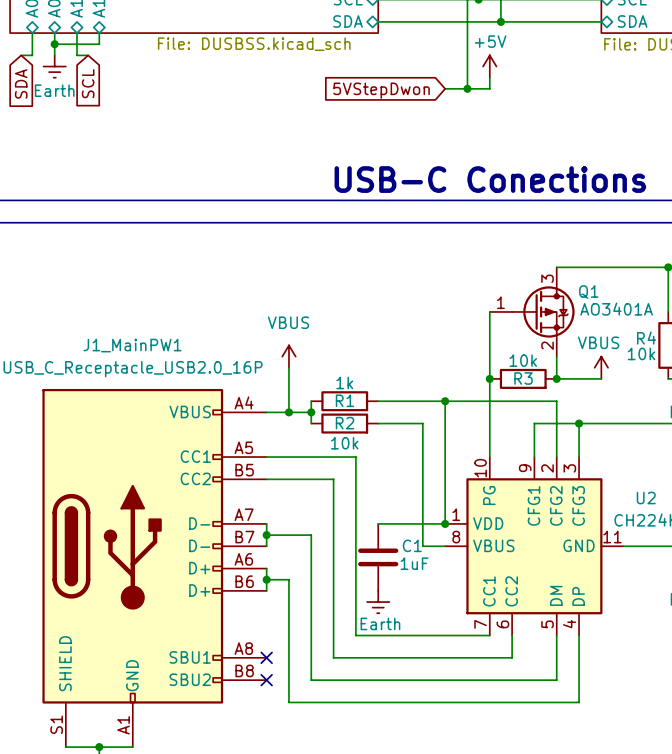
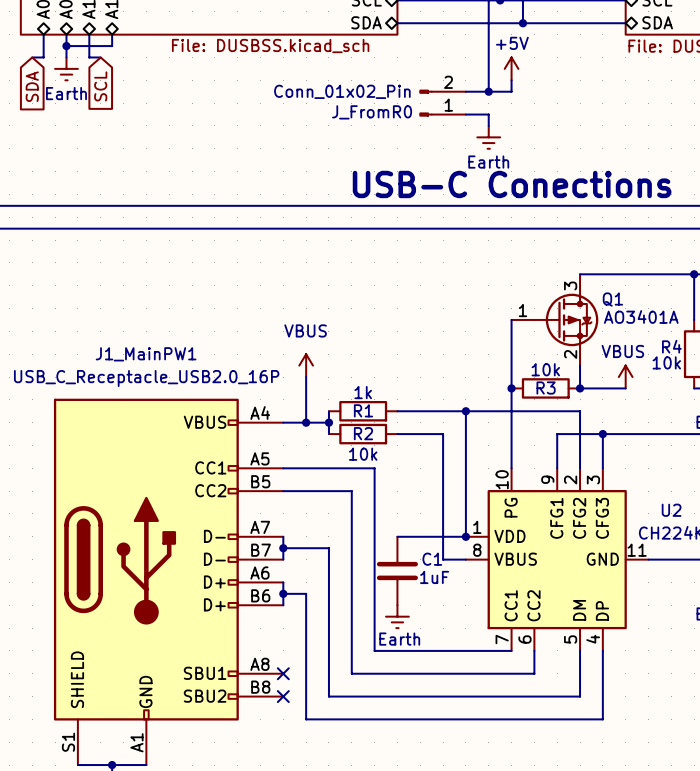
global label: 5VStepDwon (381, 90) -> none
J_FromR0: none -> Conn_01x02_Pin (442, 103)
wire: none -> (465, 114) (488, 114) (488, 125)
power symbol: none -> Earth (488, 137)

